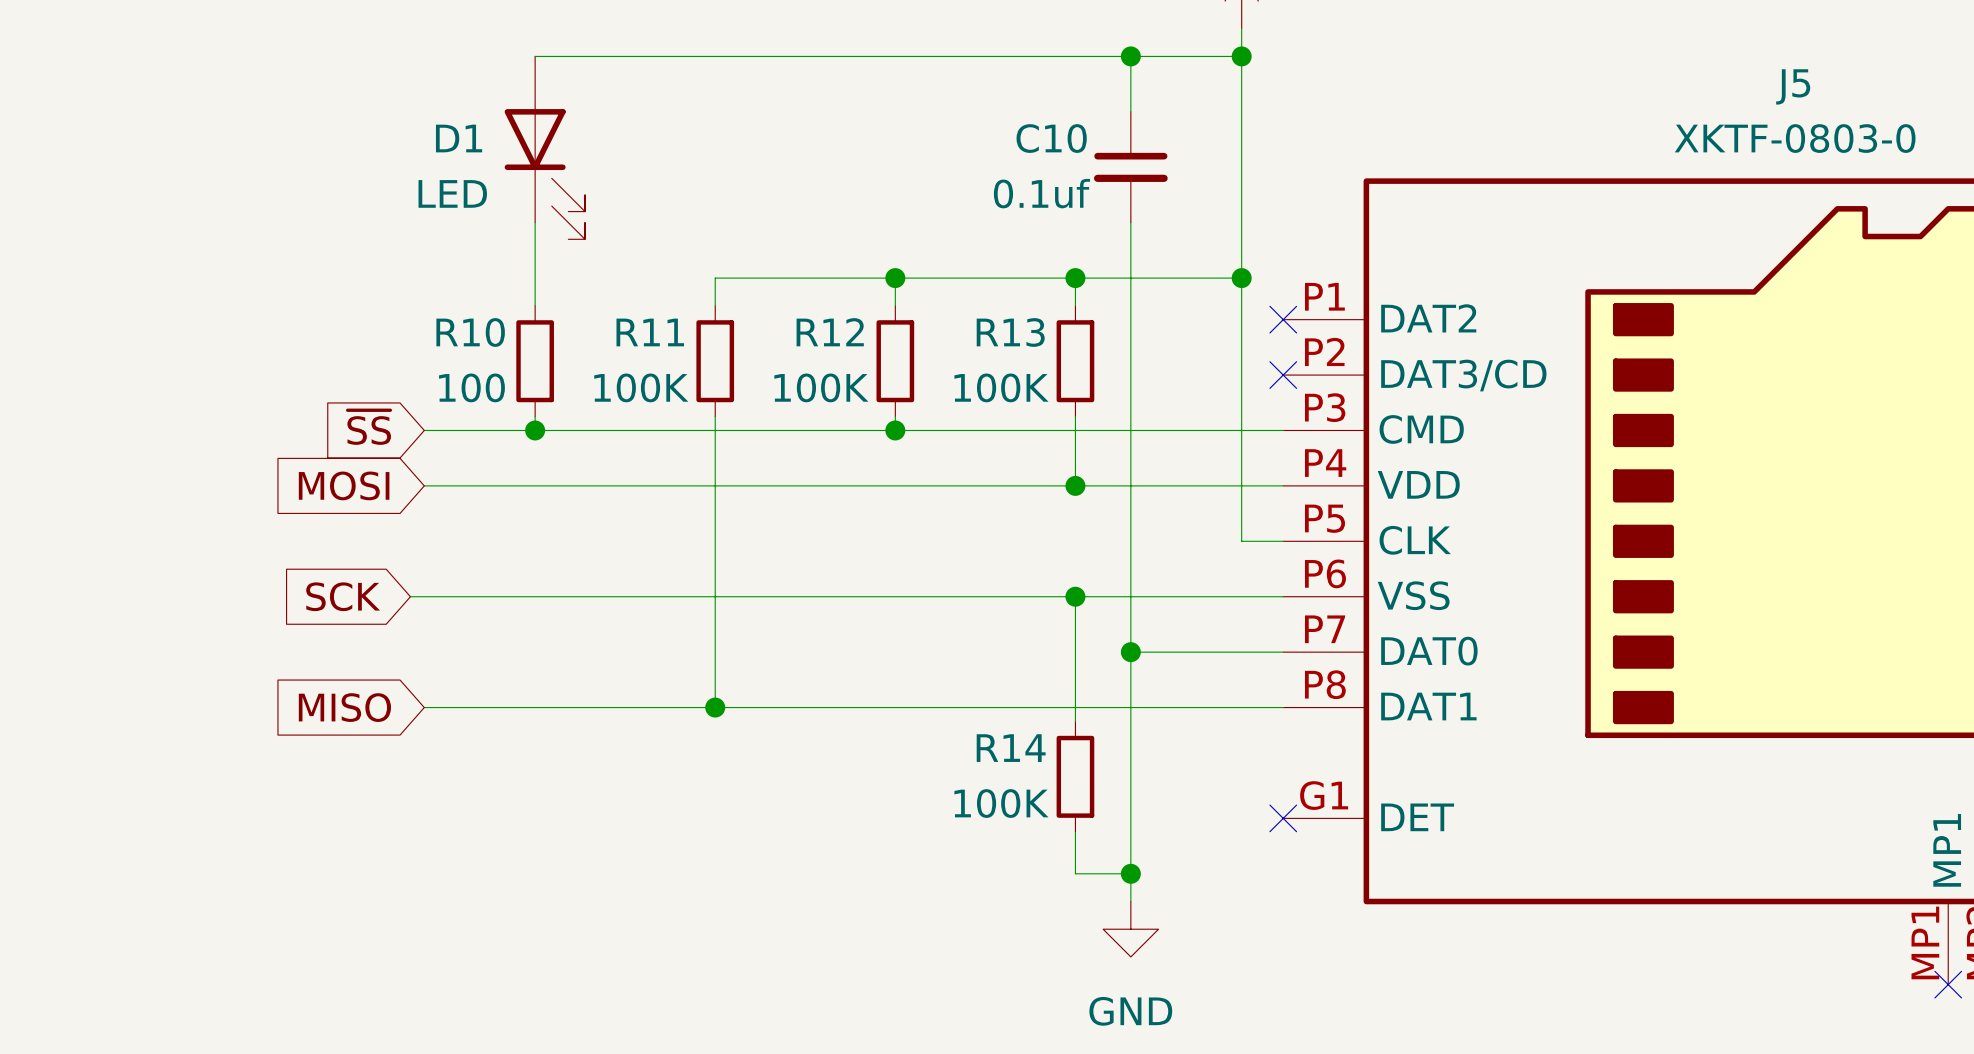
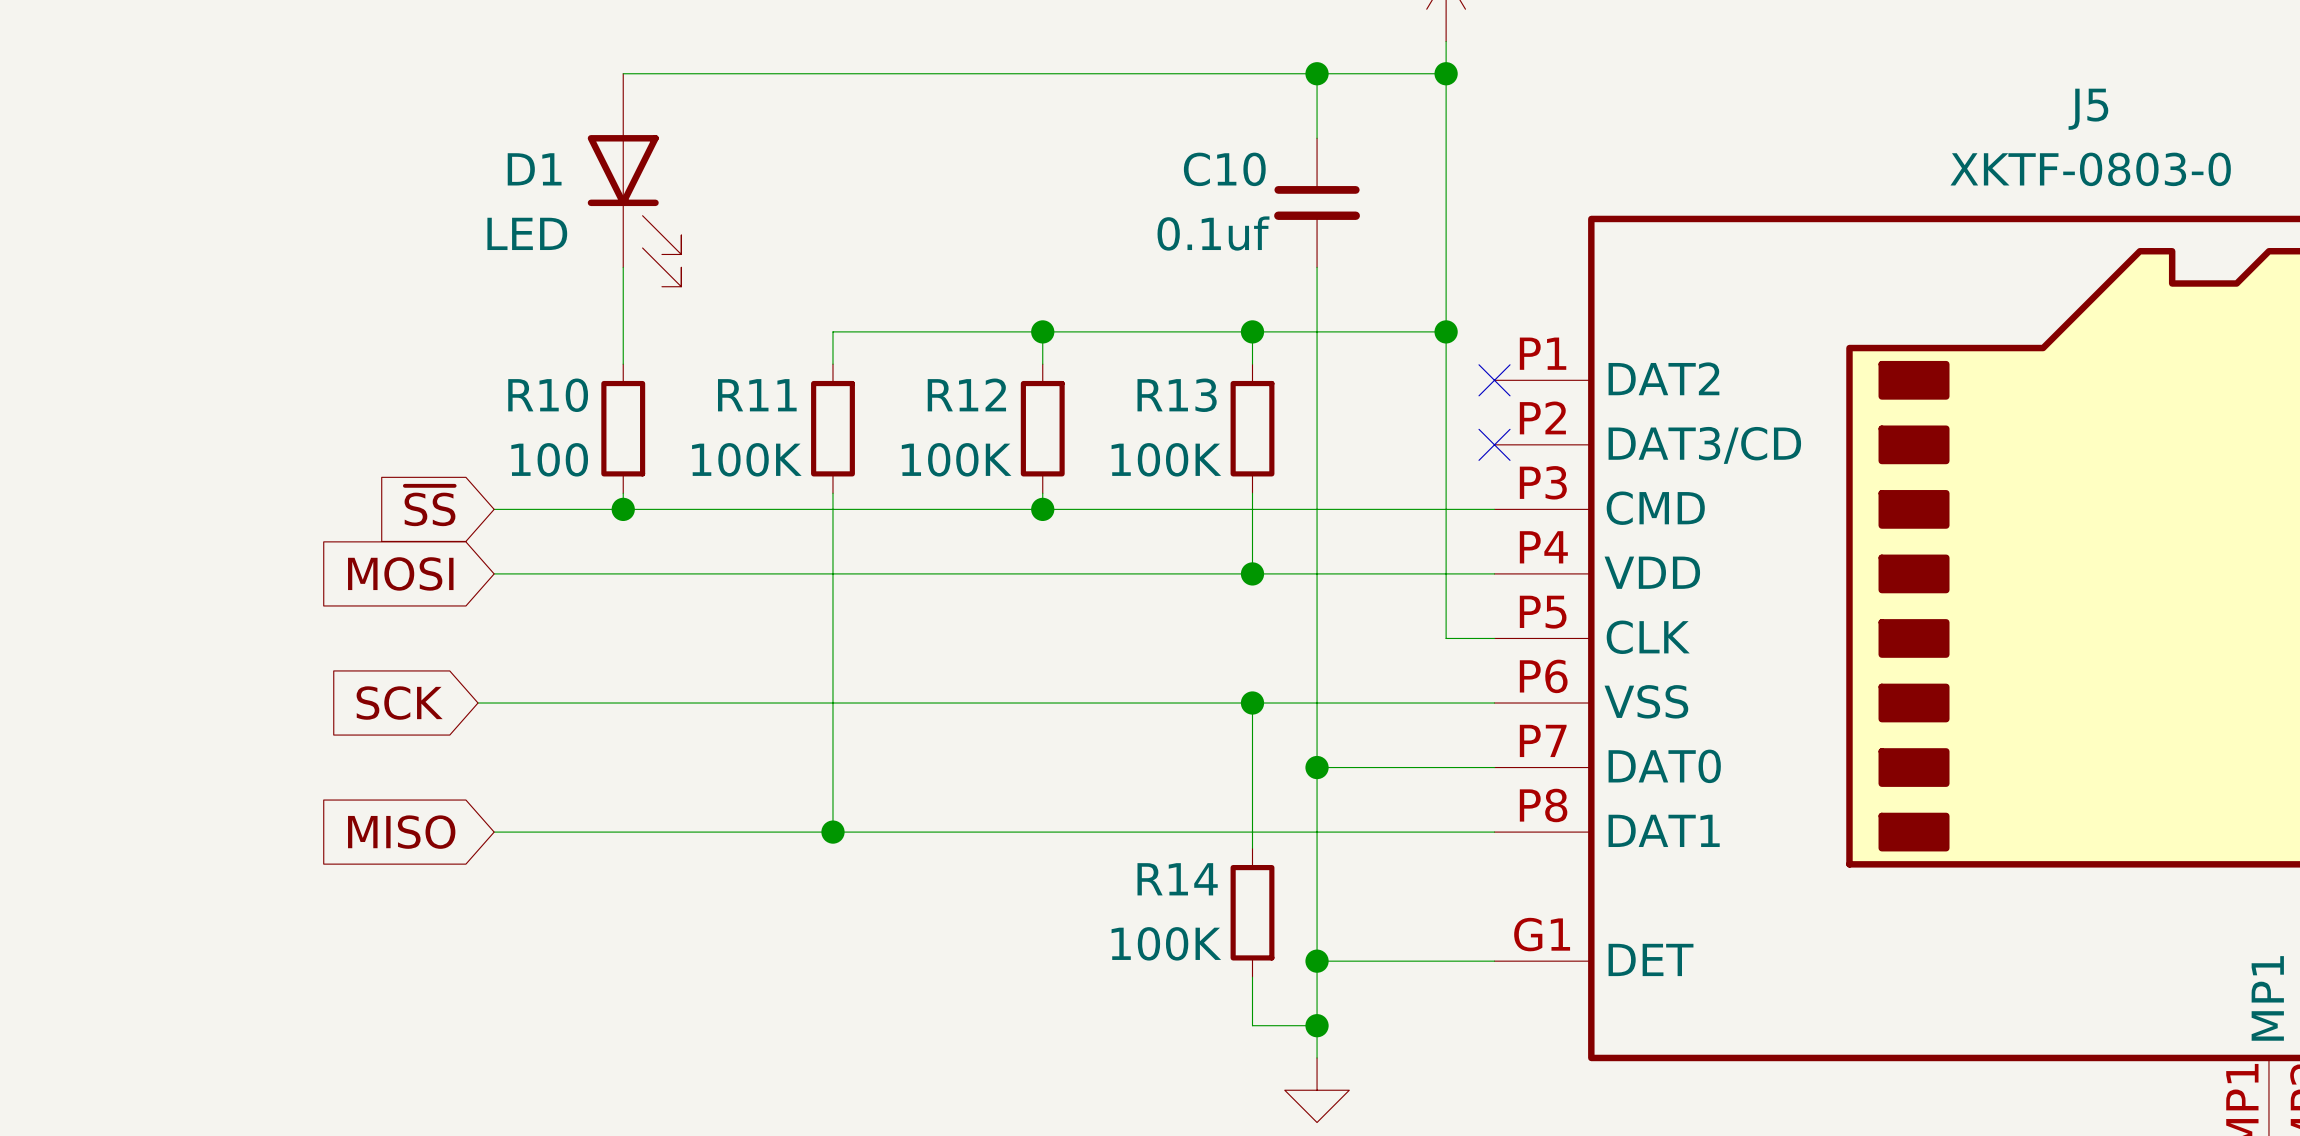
wire: none -> (1317, 961) (1494, 961)
junction: none -> (1317, 961)
no-connect mark: (1283, 818) -> none

